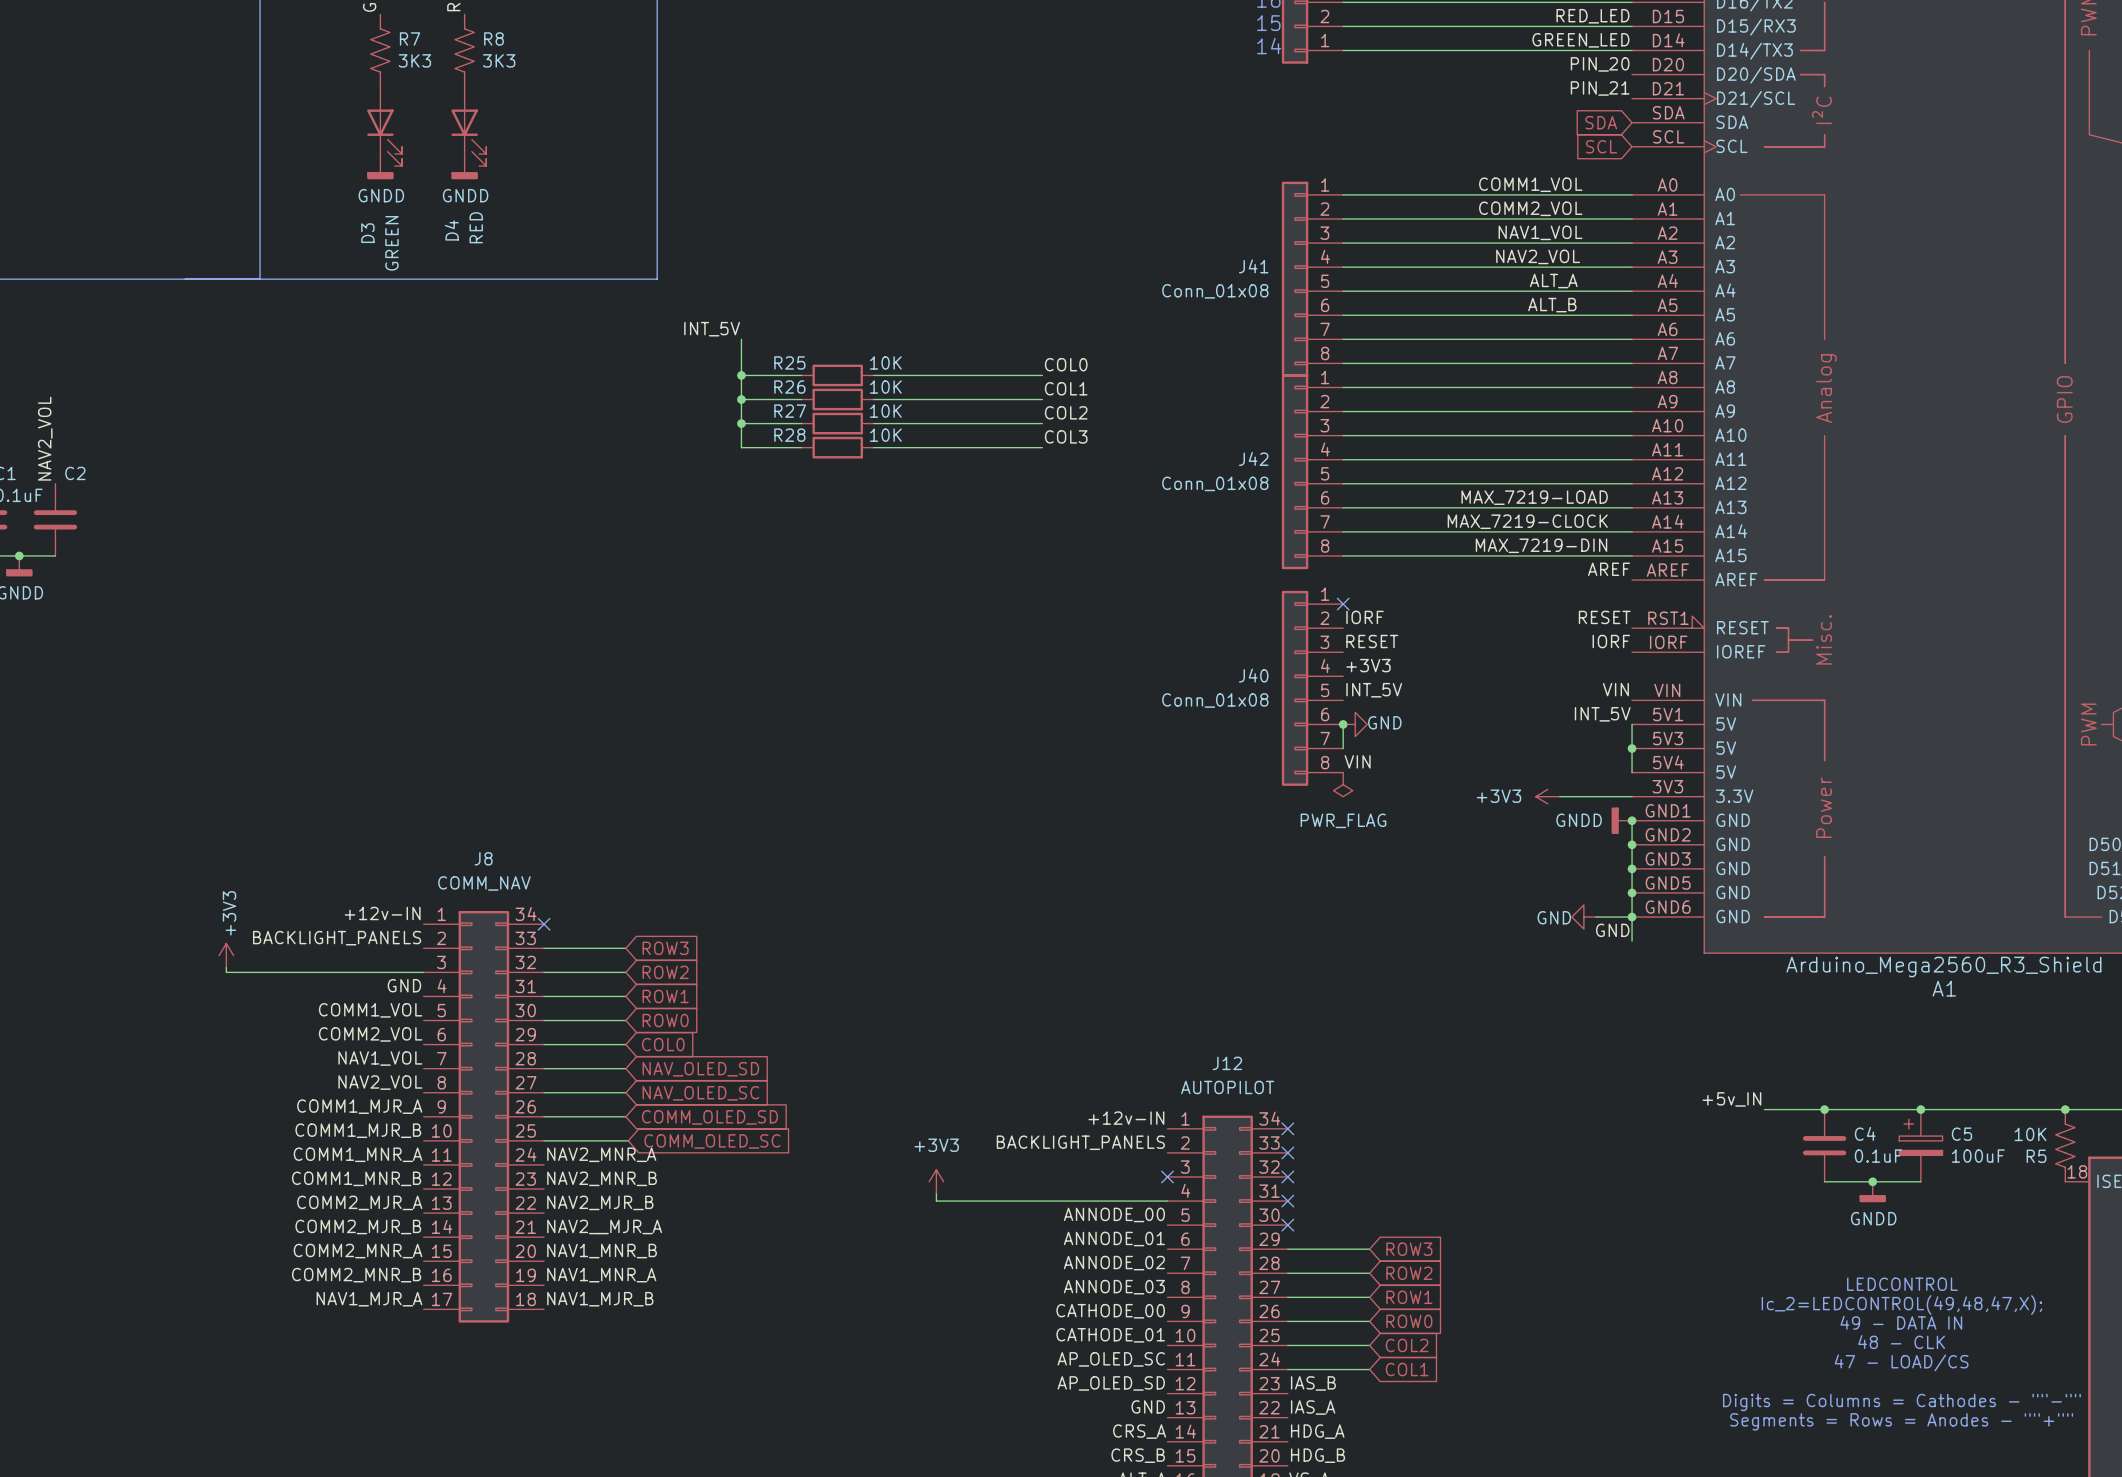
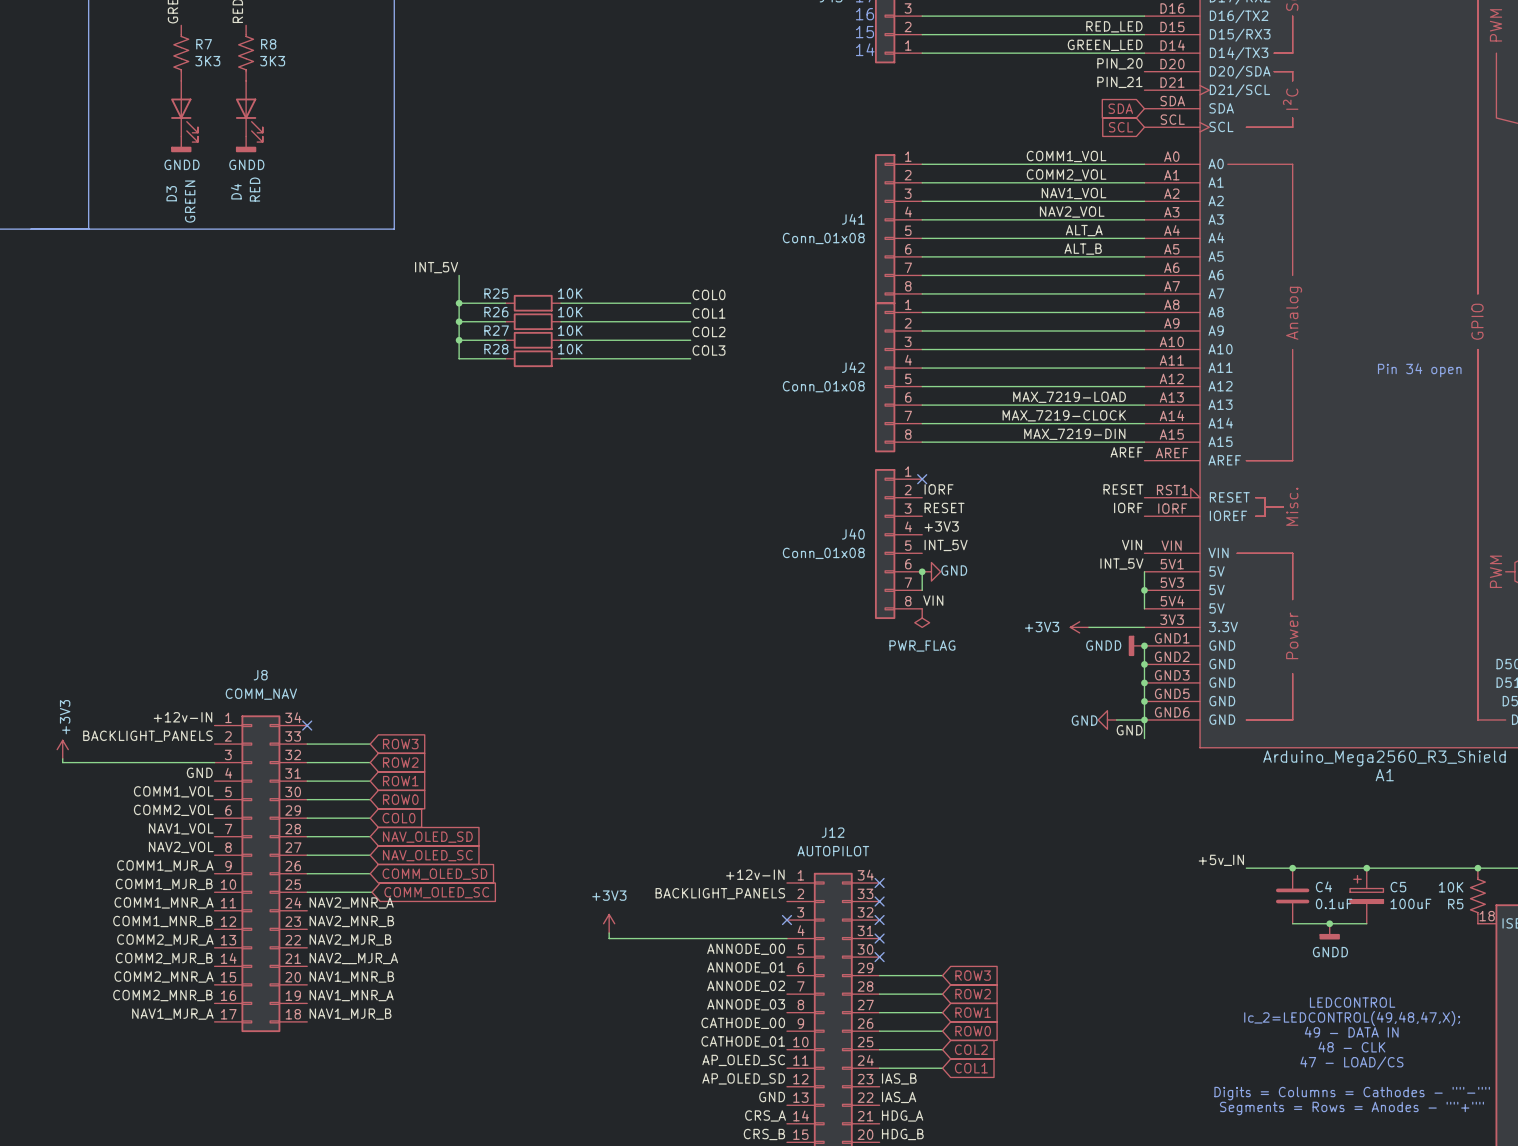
text: none -> Pin 34 open (1419, 370)

